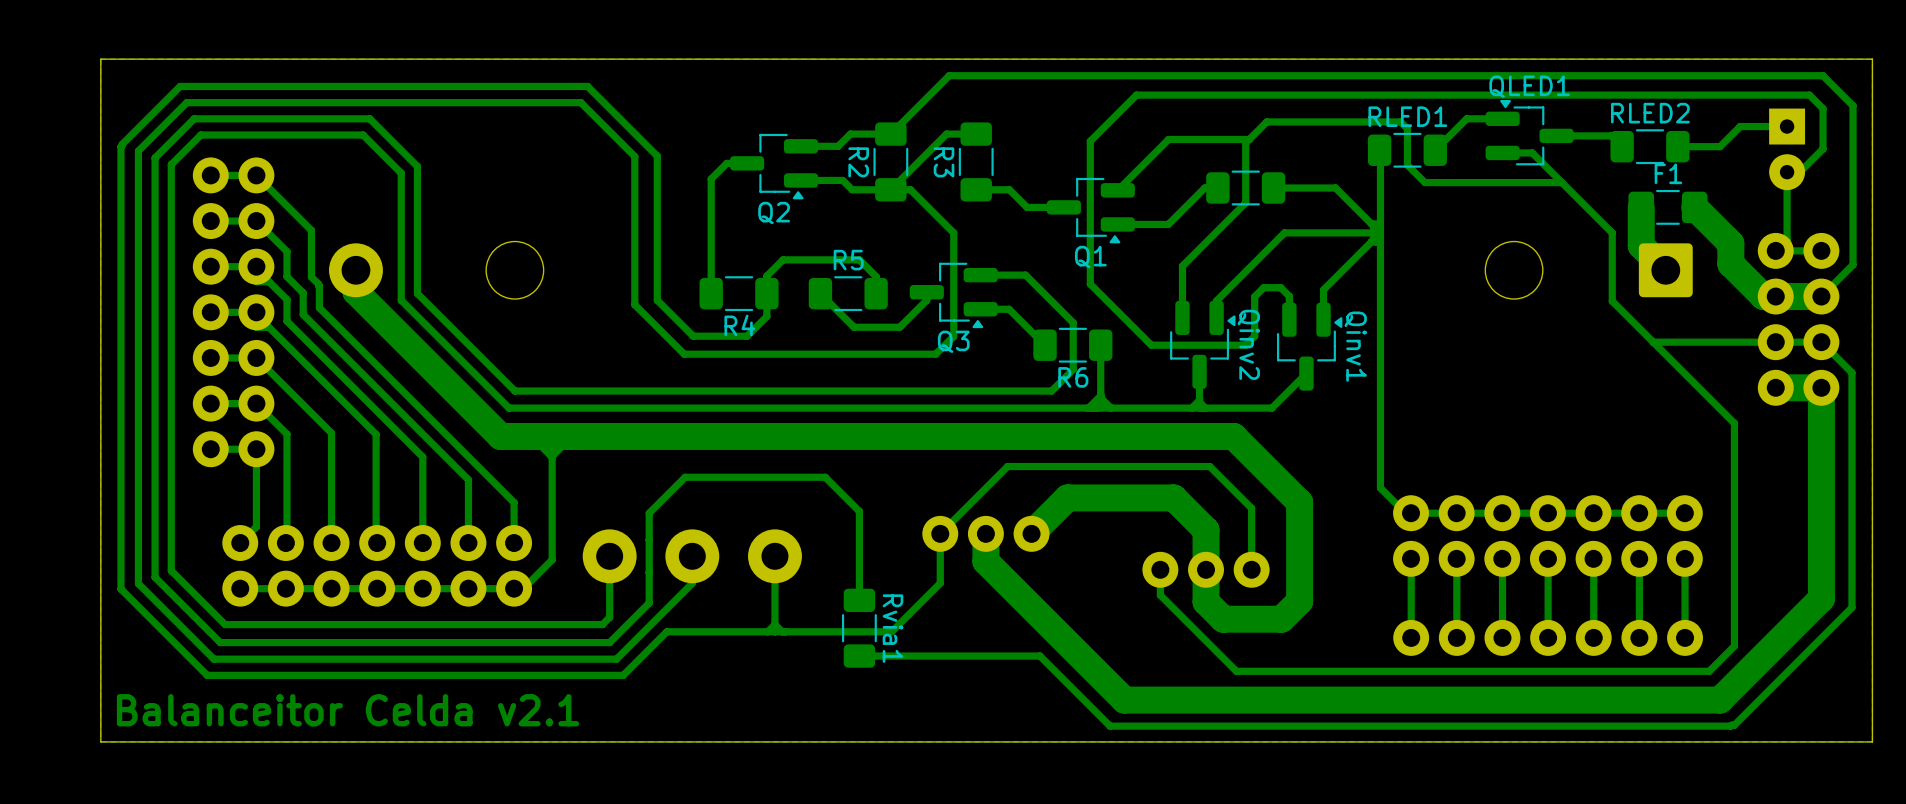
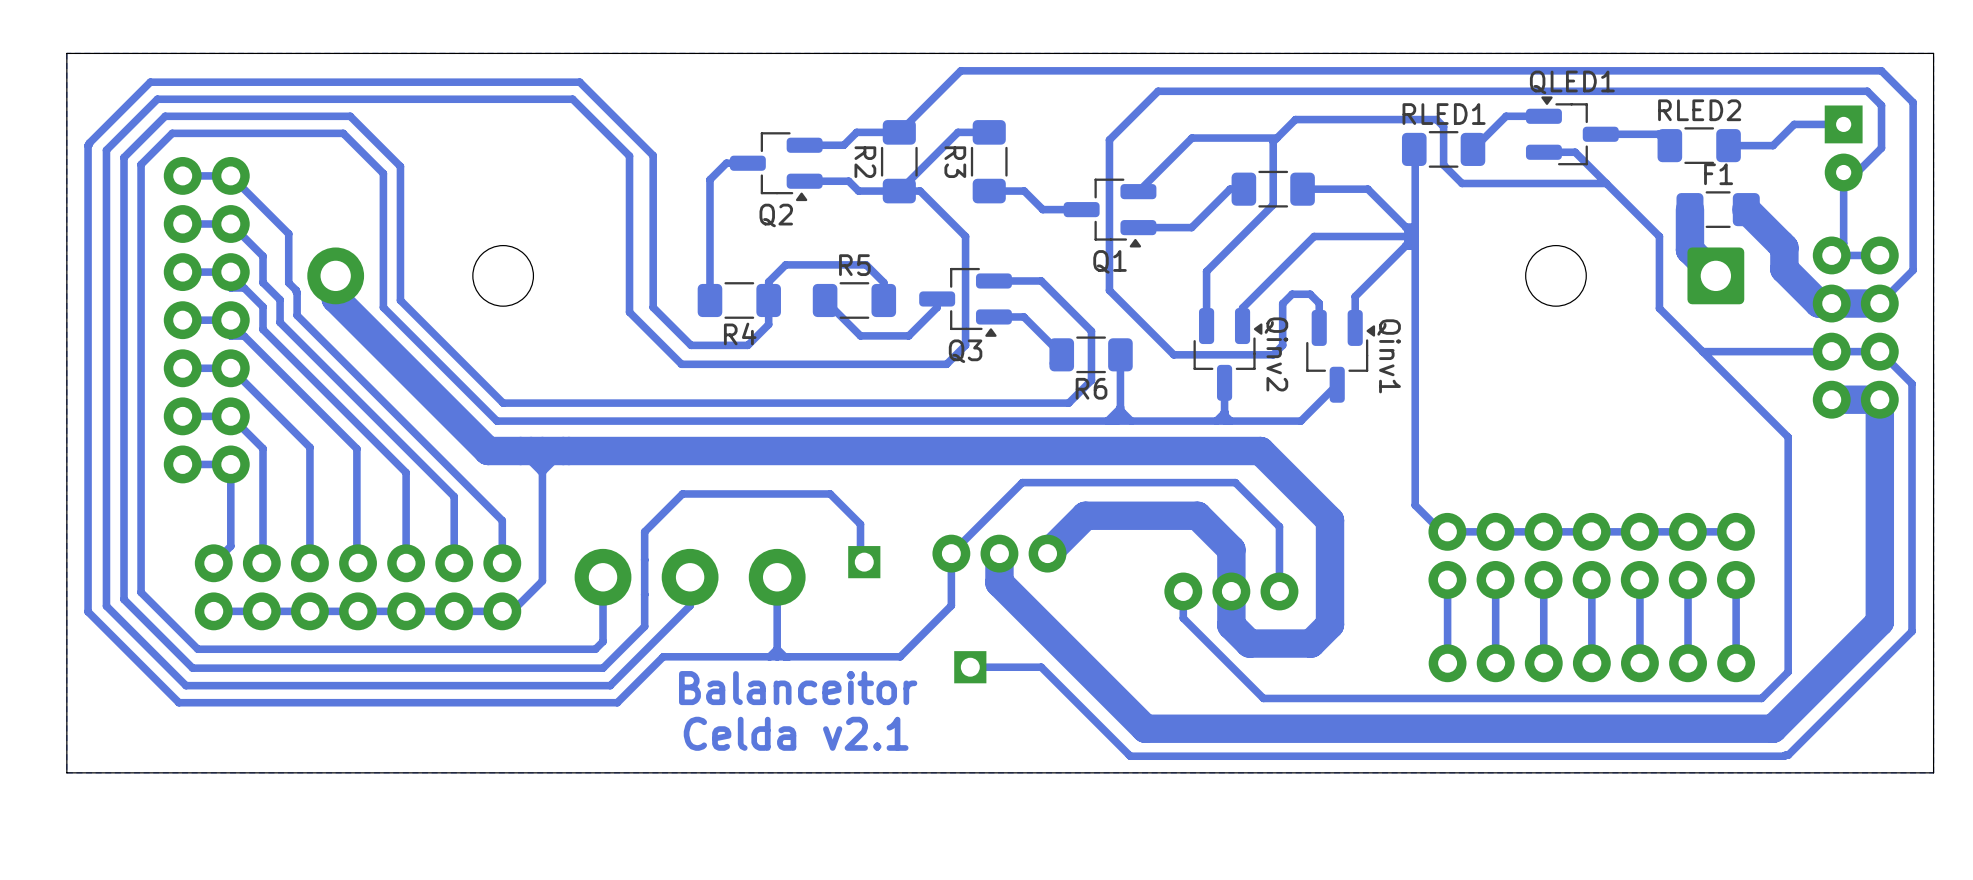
track: (854, 506) (859, 511) (859, 600) -> (860, 524) (860, 558) (864, 562)
part: none -> (864, 562)
Rvia1: (859, 628) -> none
part: none -> (970, 667)
track: (1039, 656) (859, 656) -> (1056, 682) (1041, 667) (970, 667)
text: none -> Balanceitor (798, 688)
text: none -> Celda v2.1 (796, 733)
text: Balanceitor Celda v2.1 (347, 710) -> none

